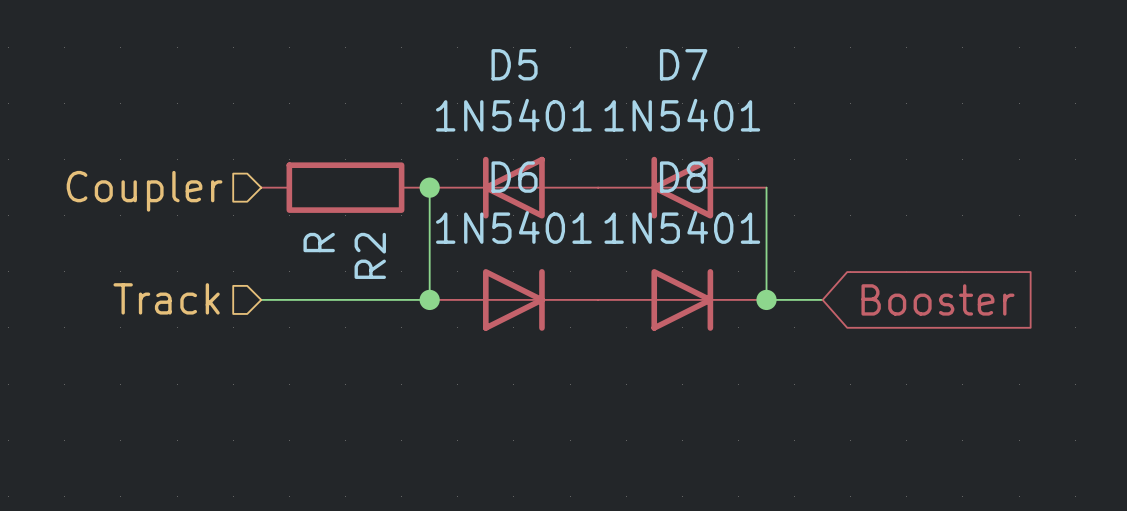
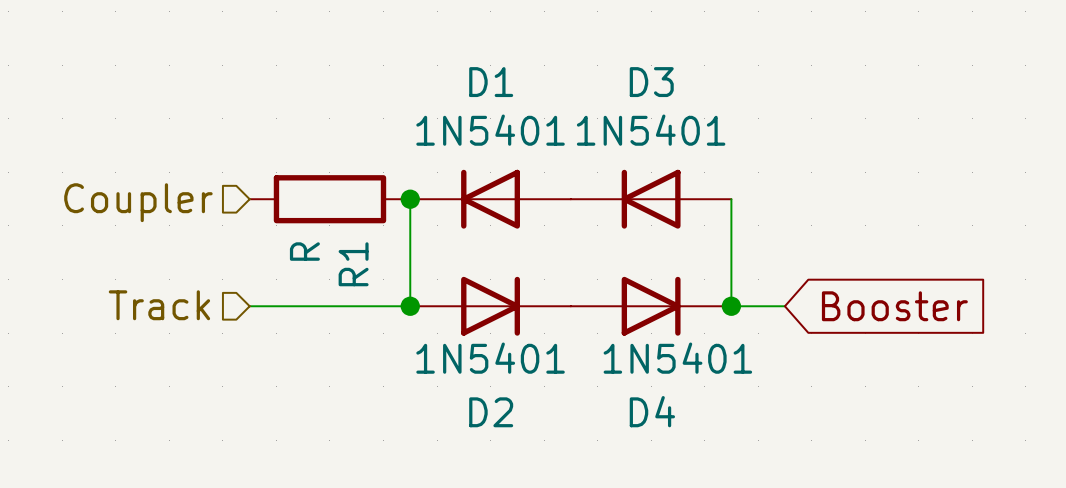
D5 name: D5 (514, 64) -> D1 (491, 82)
D7 name: D7 (683, 64) -> D3 (651, 82)
D6 name: D6 (514, 177) -> D2 (491, 412)
D8 name: D8 (682, 177) -> D4 (652, 411)
D6 value position: 1N5401 (513, 227) -> 1N5401 (490, 358)
D8 value position: 1N5401 (682, 227) -> 1N5401 (677, 358)
R2 name: R2 (370, 255) -> R1 (353, 264)

